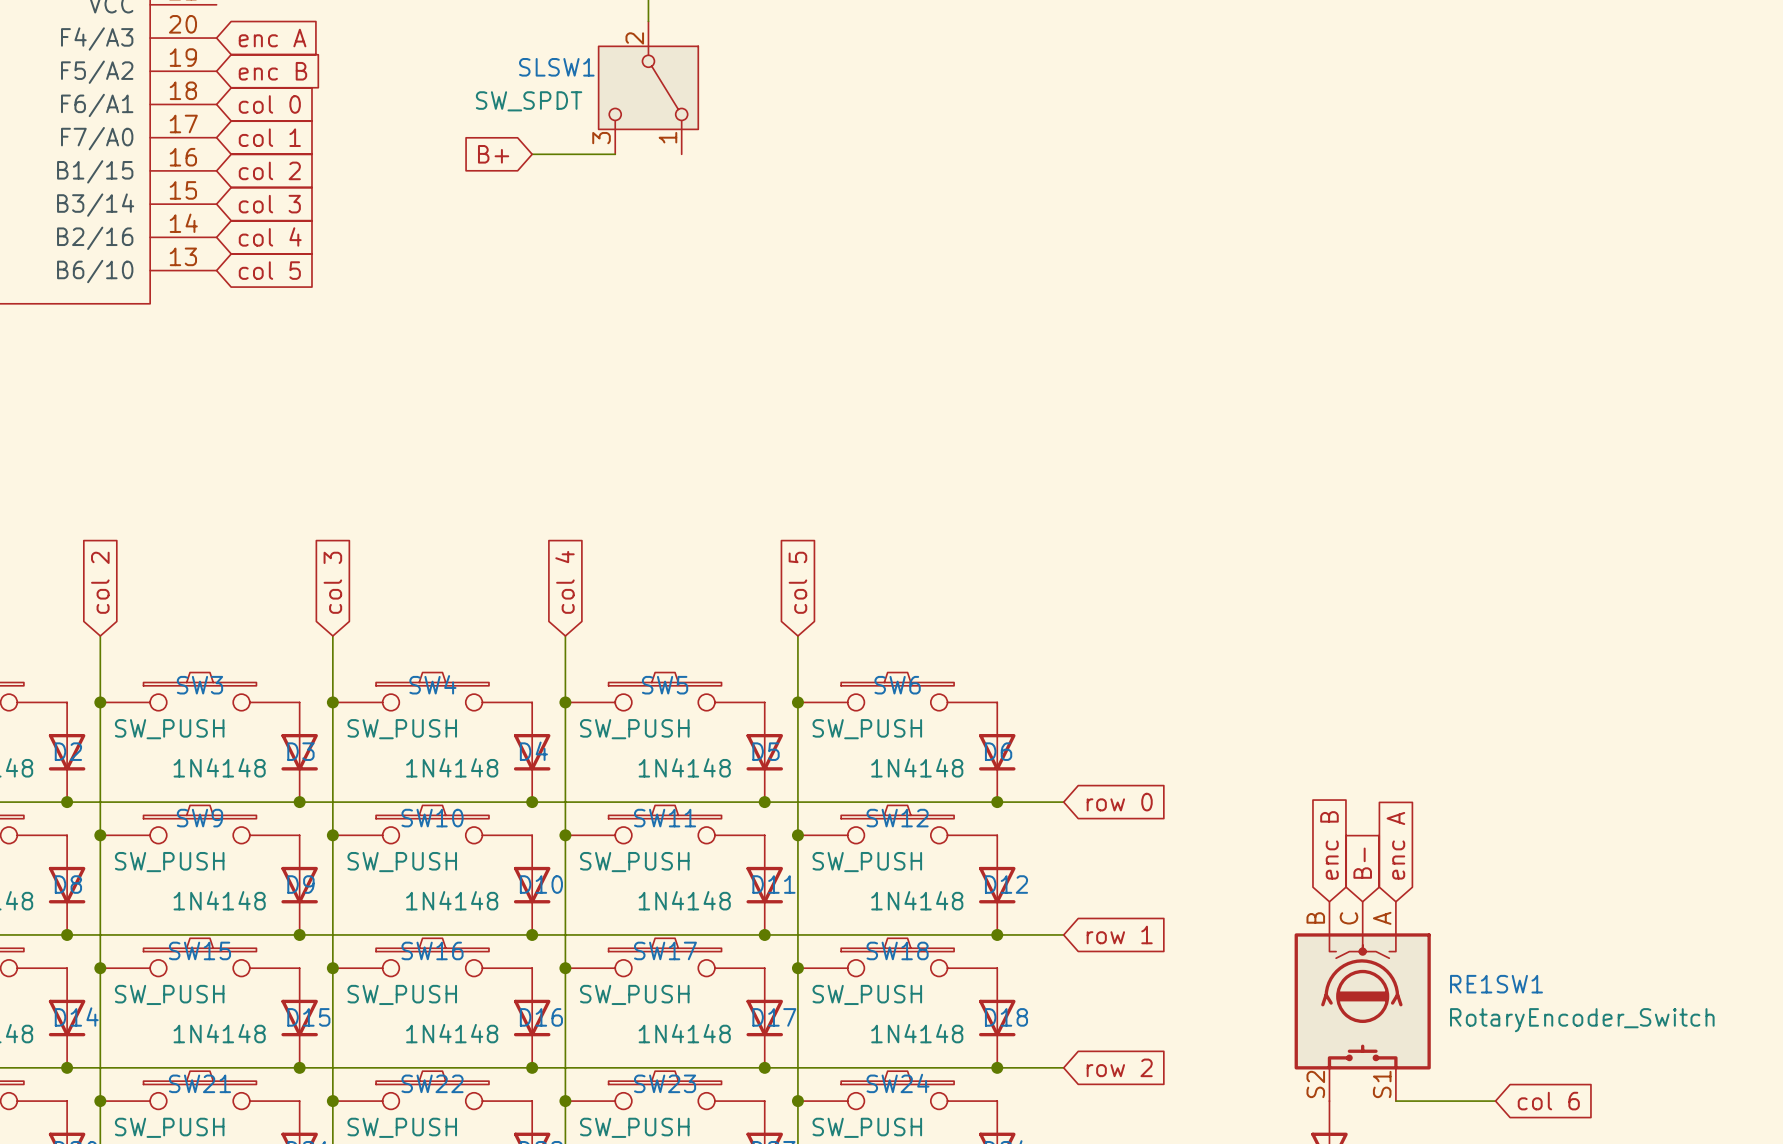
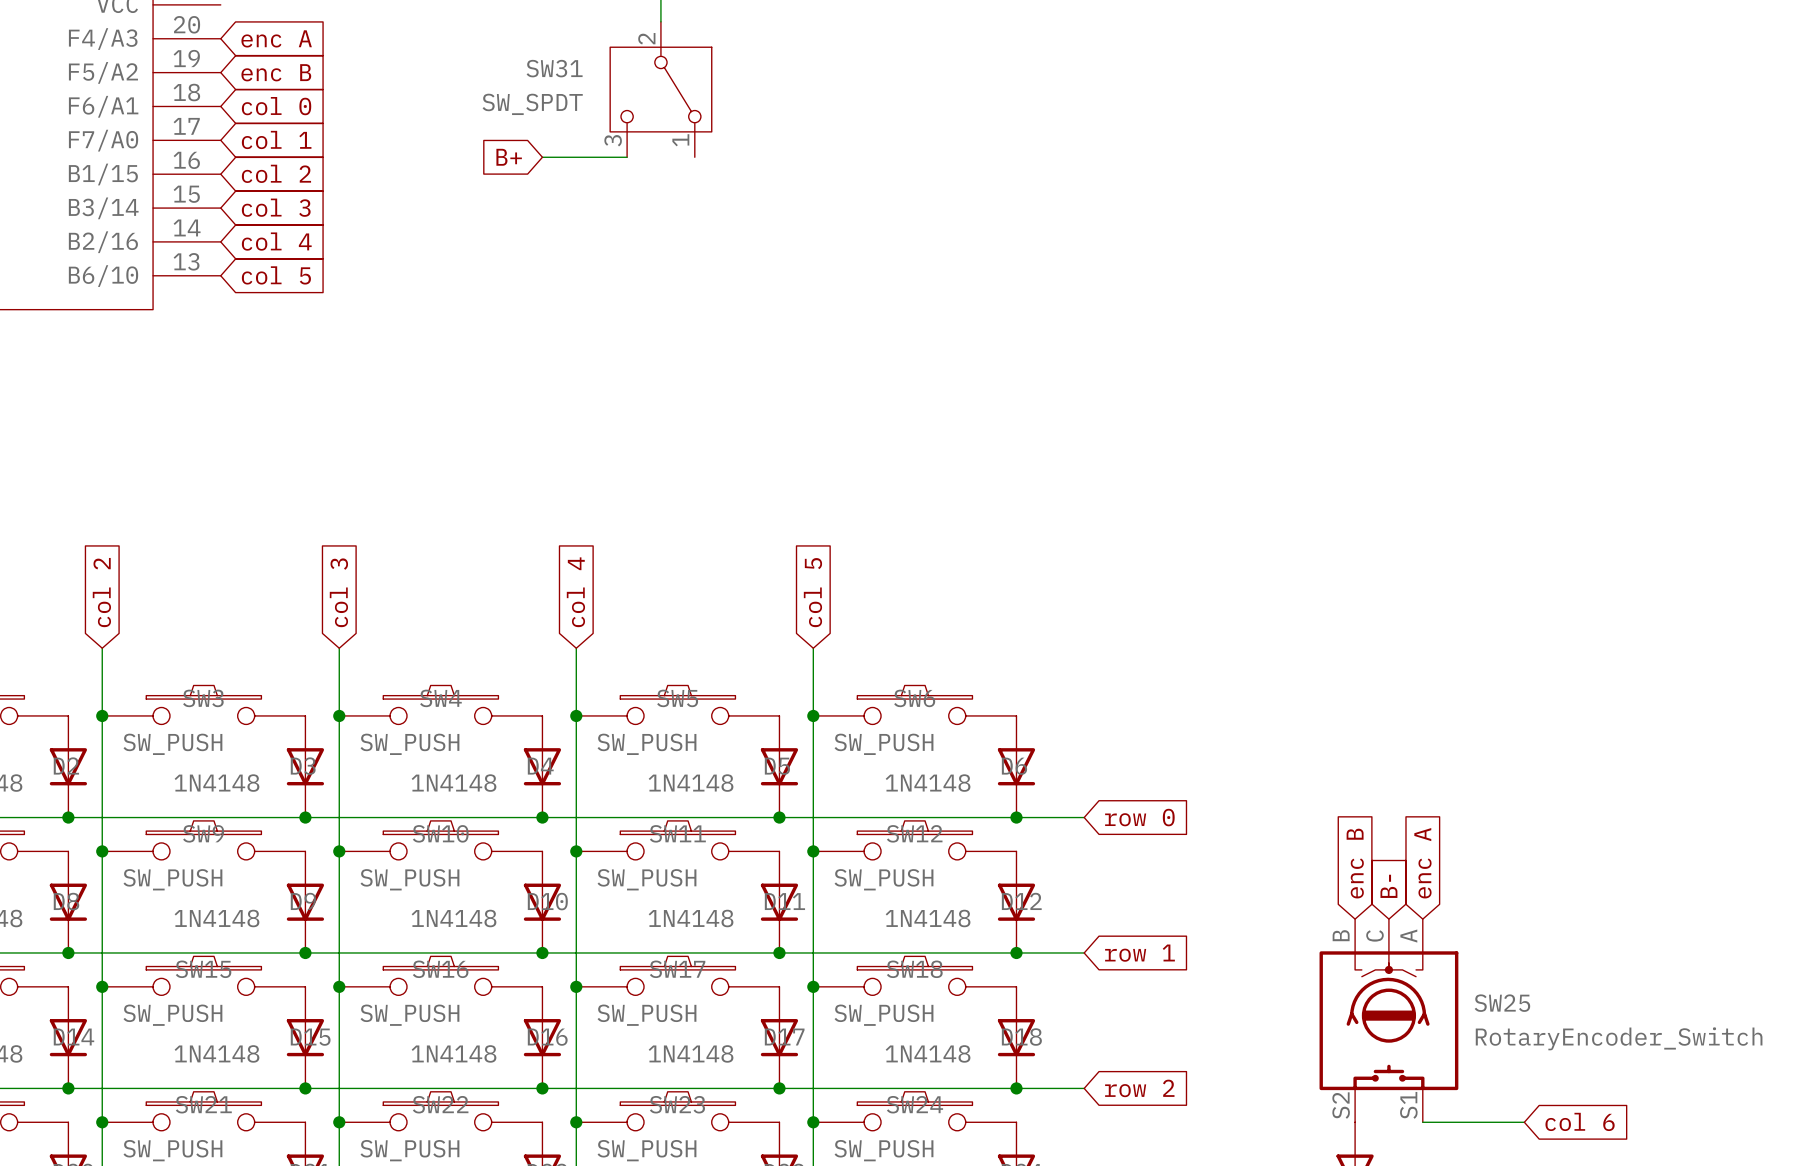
SLSW1 name: SLSW1 (556, 67) -> SW31 (554, 68)
RE1SW1 name: RE1SW1 (1496, 984) -> SW25 (1502, 1003)

